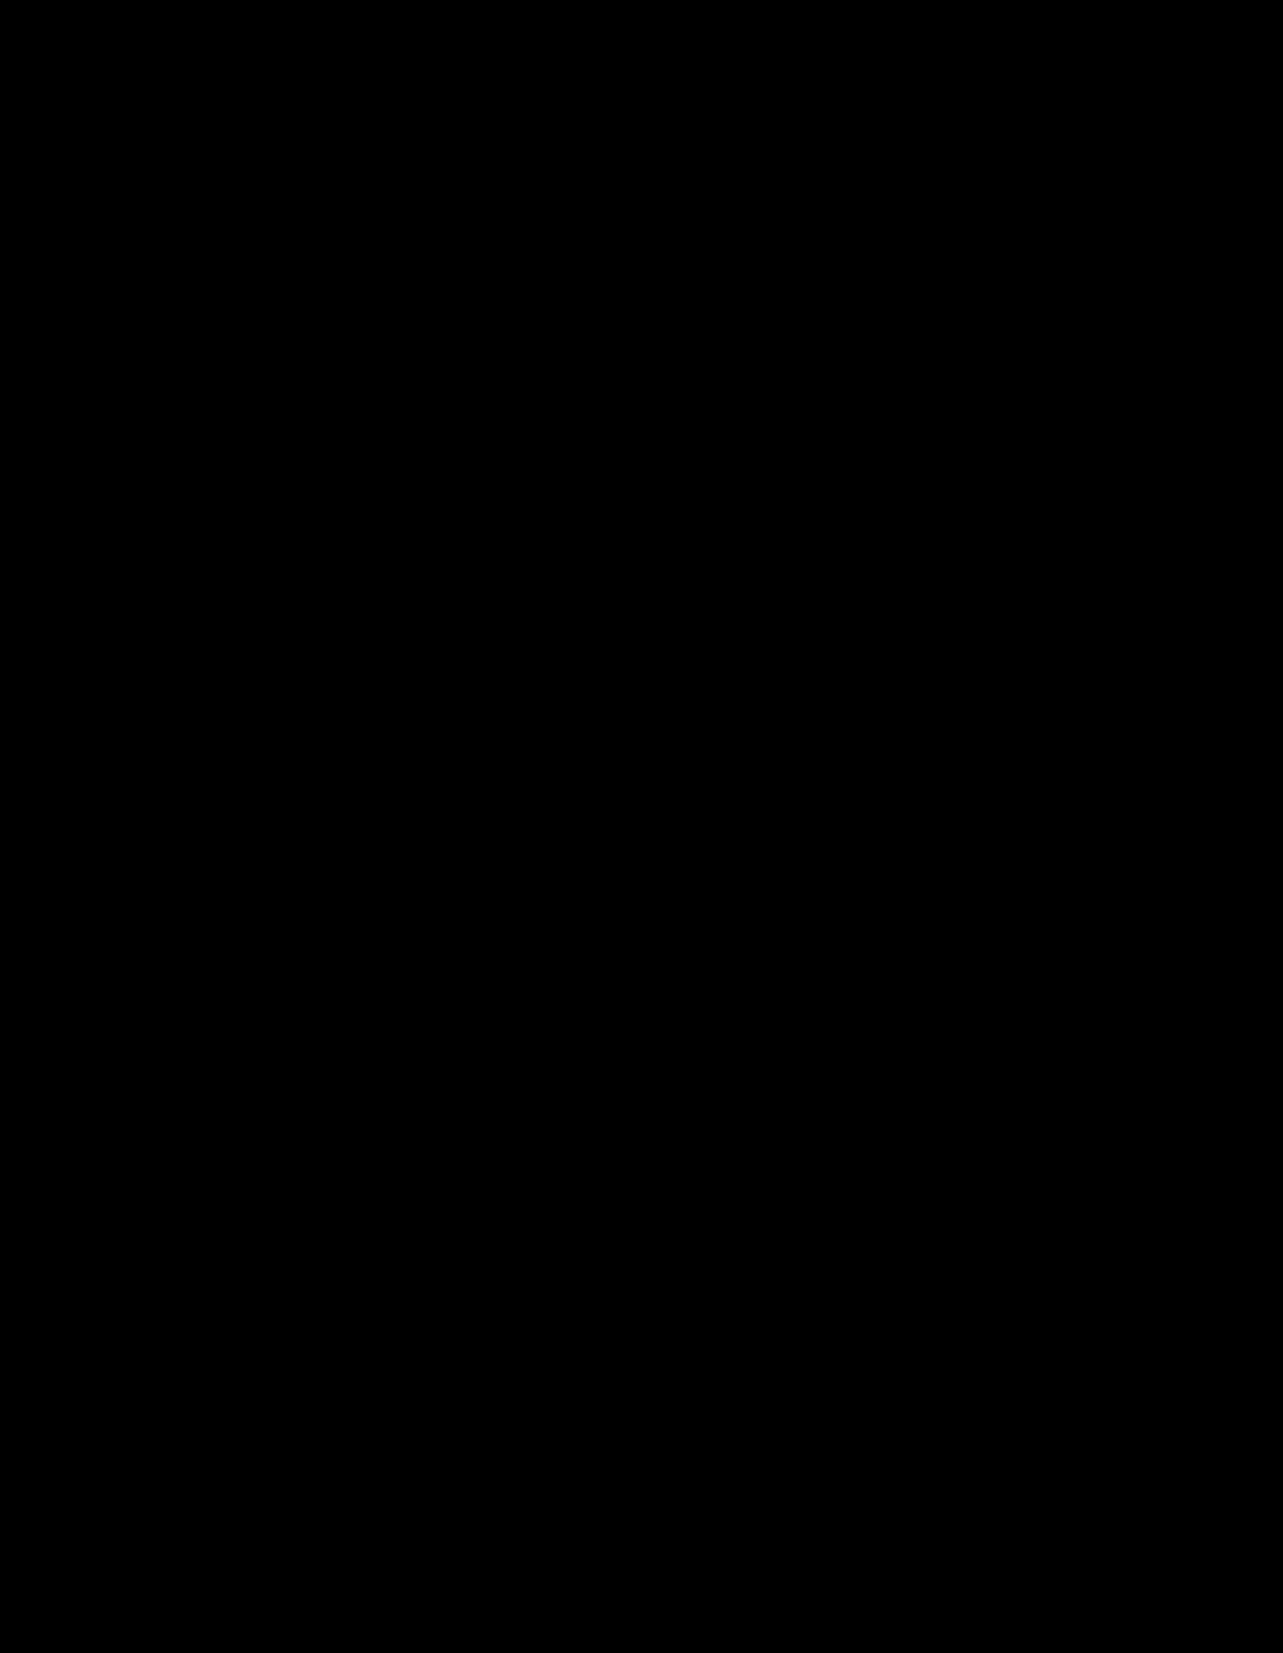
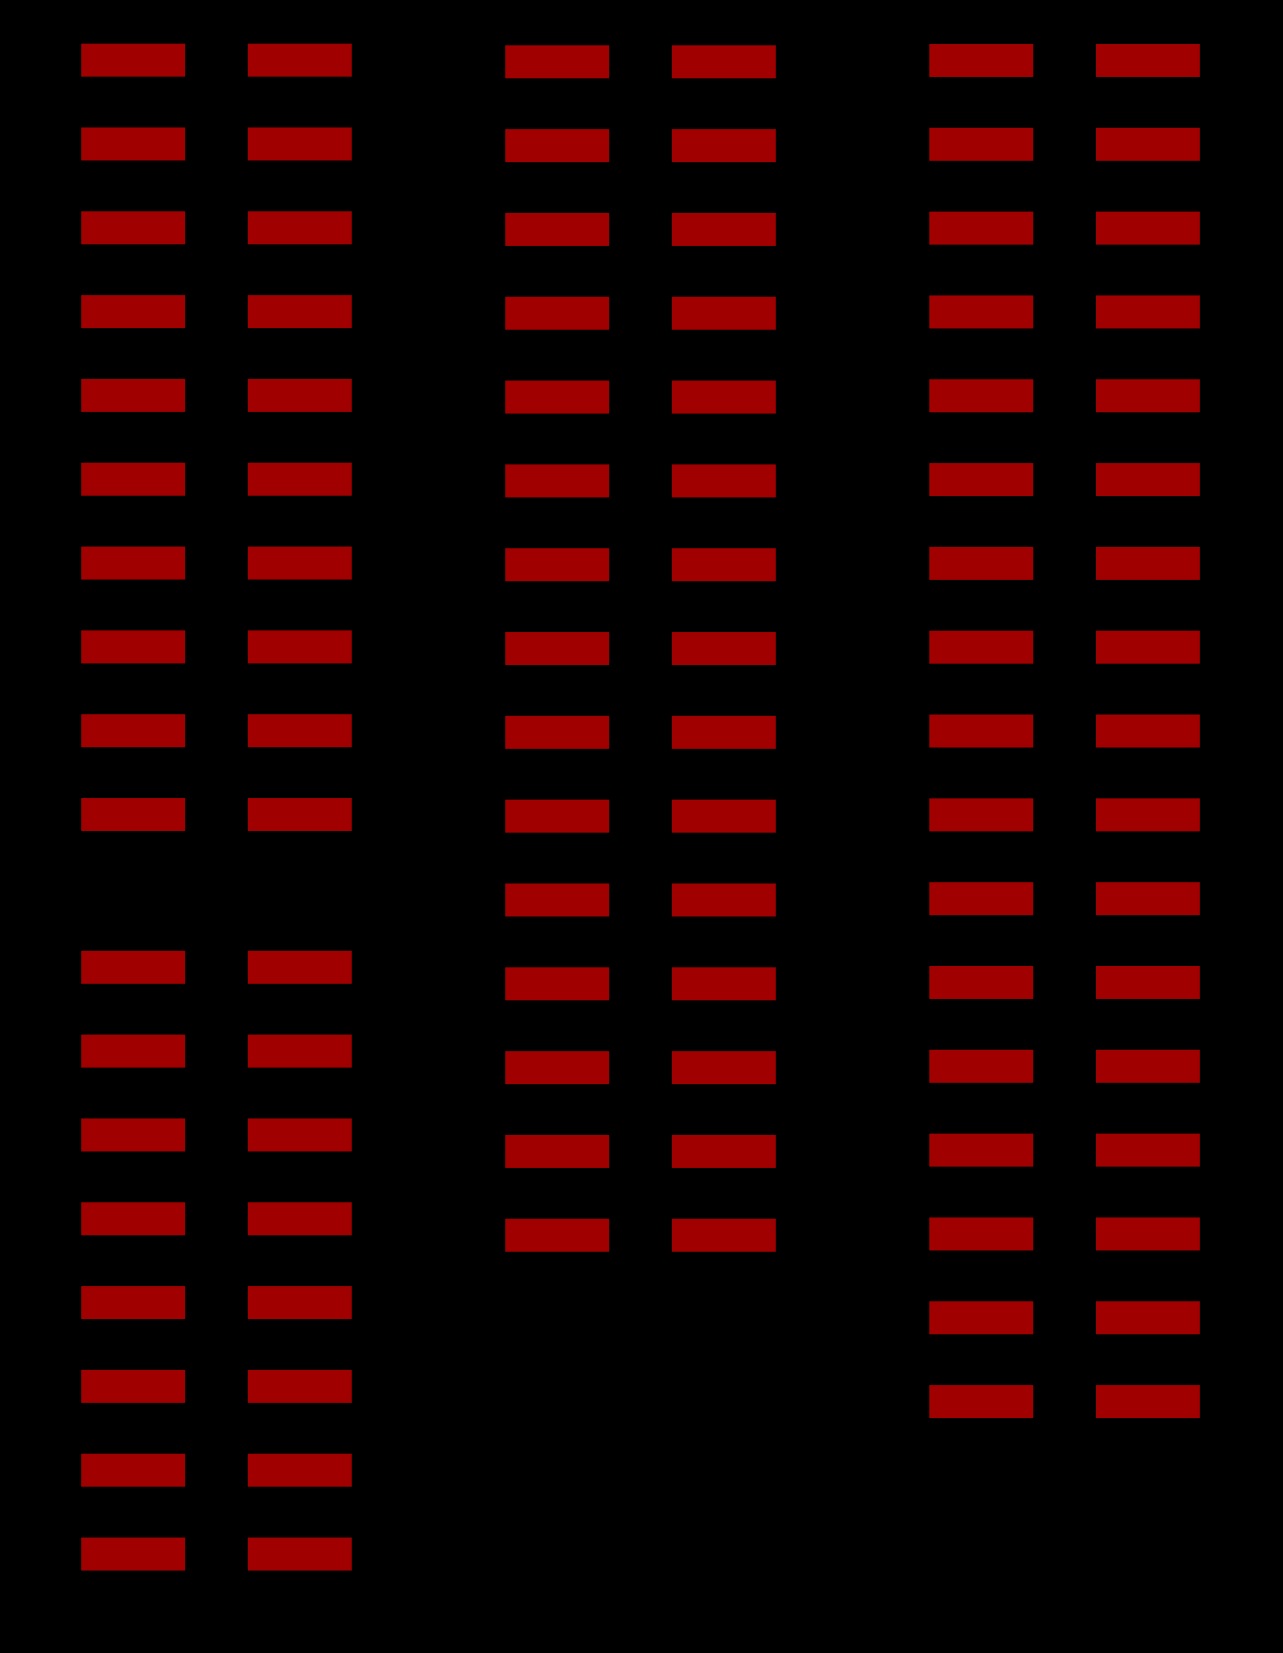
part: none -> (216, 437)
part: none -> (640, 648)
part: none -> (1064, 731)
part: none -> (216, 1260)

